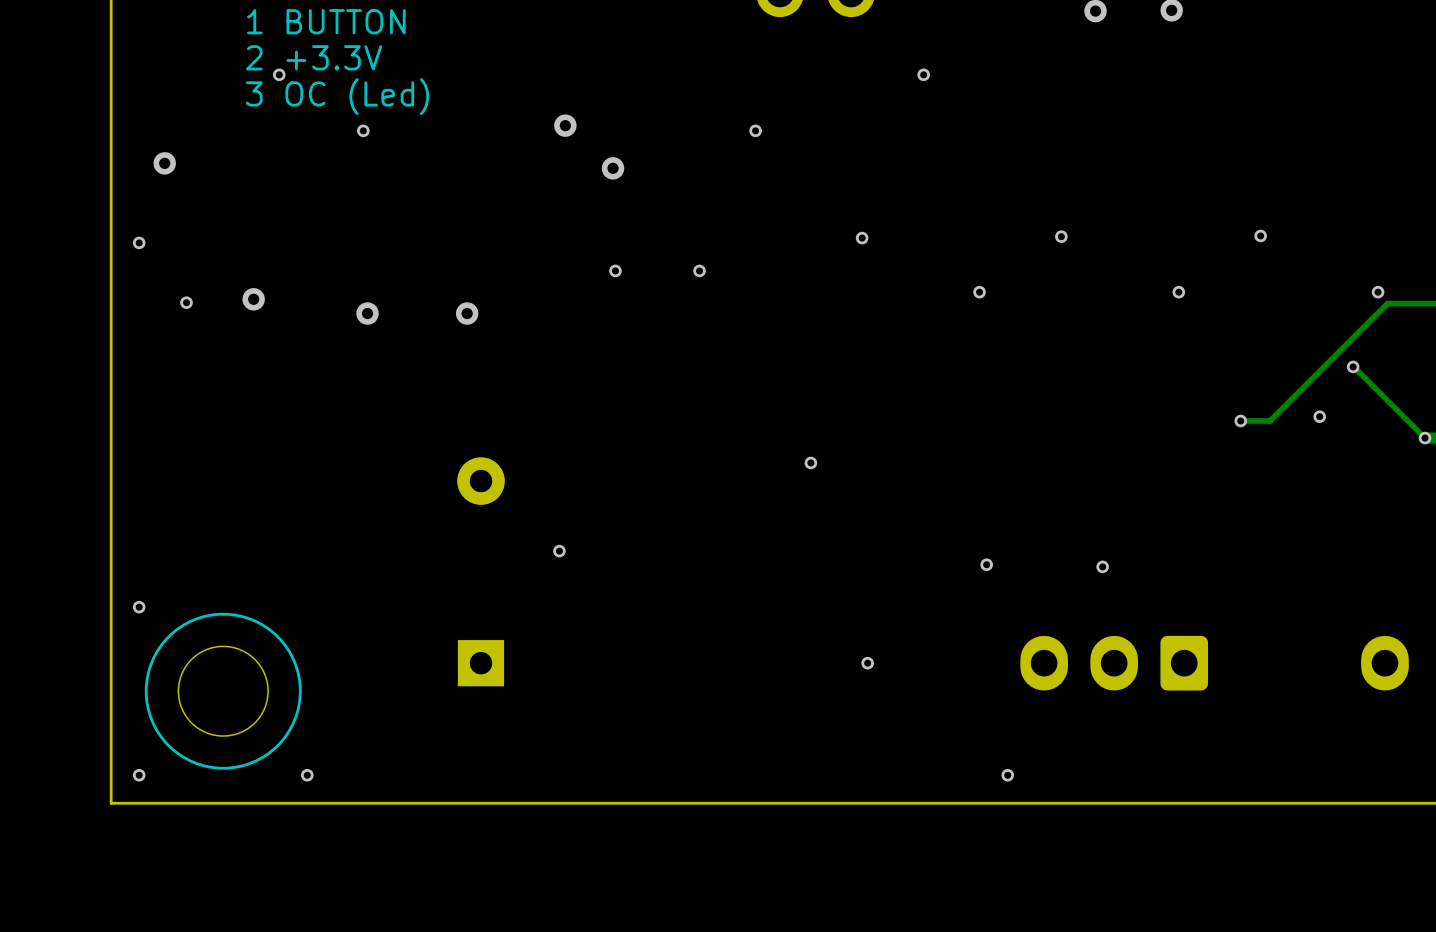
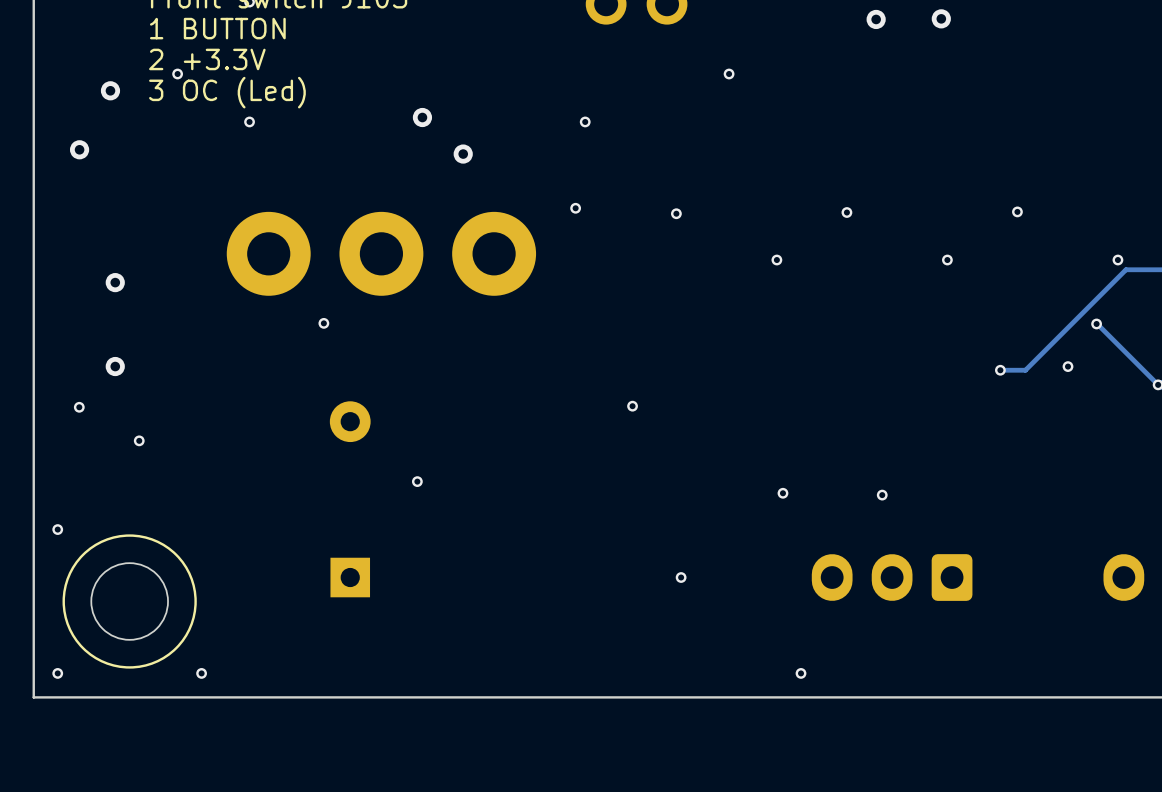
via: none -> (110, 90)
via: (139, 242) -> none
via: (615, 270) -> none
via position: (699, 270) -> (575, 208)
part: none -> (381, 253)
via position: (253, 299) -> (115, 282)
via: (186, 302) -> none
via: (367, 313) -> none
via: (467, 313) -> none
via: none -> (323, 323)
via: none -> (115, 366)
via: none -> (79, 407)
via: none -> (139, 440)

